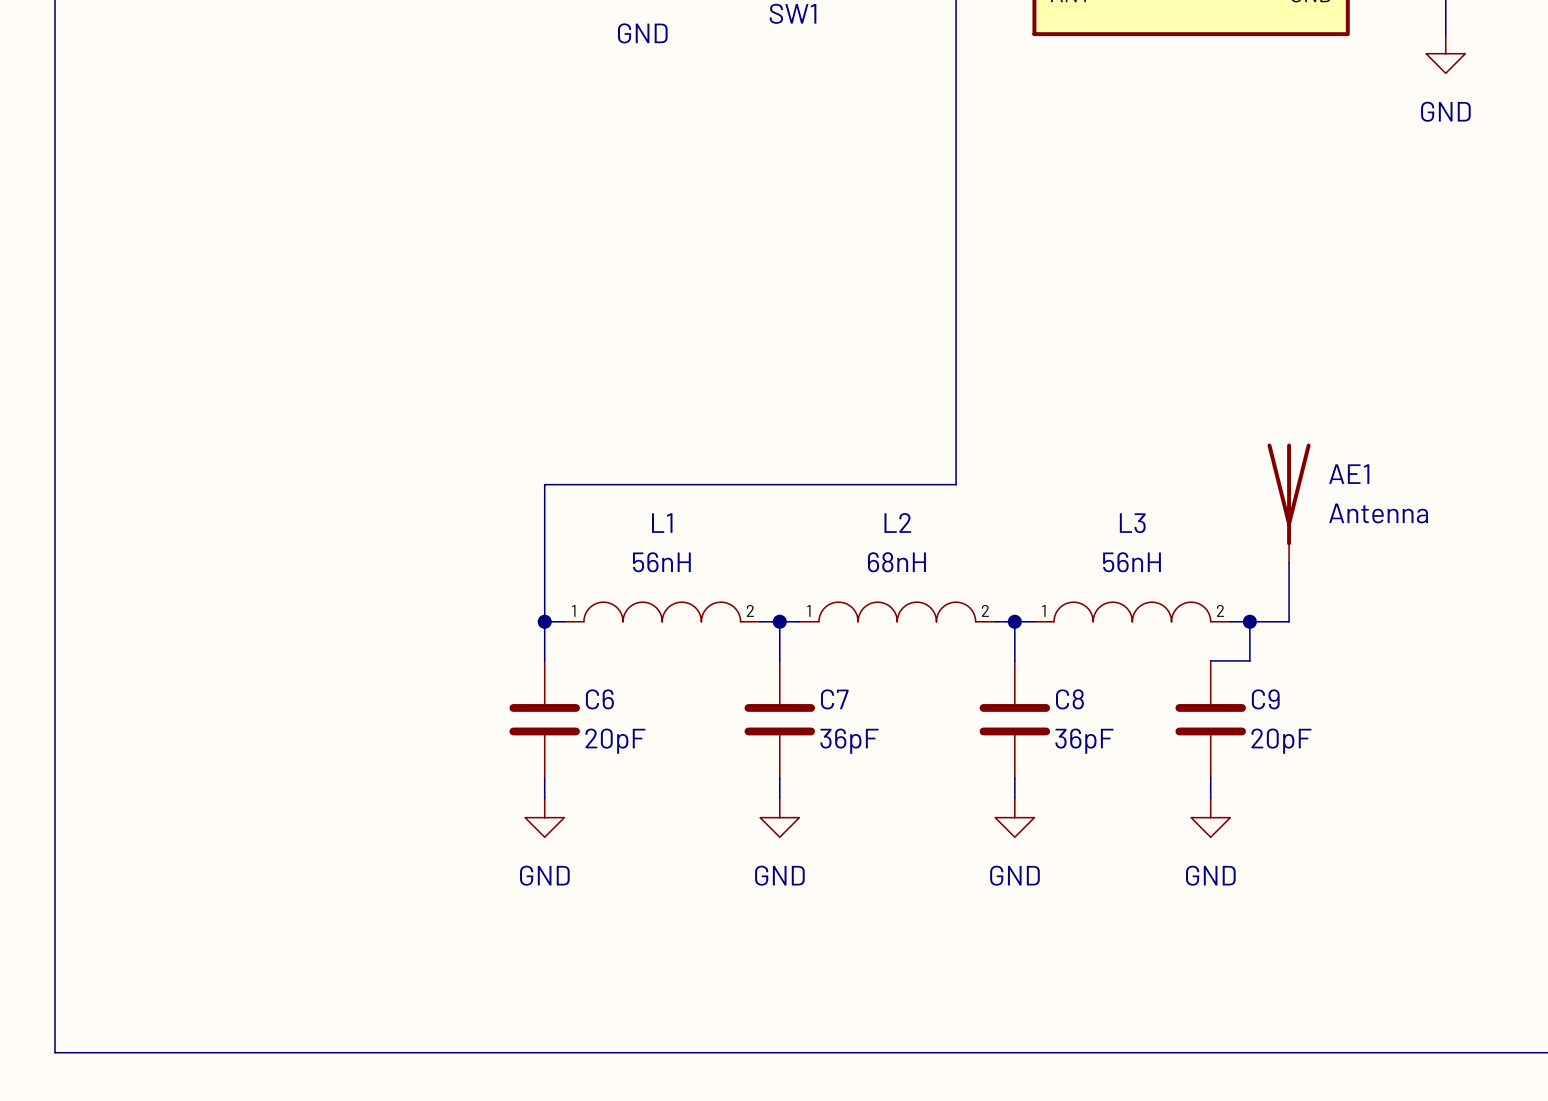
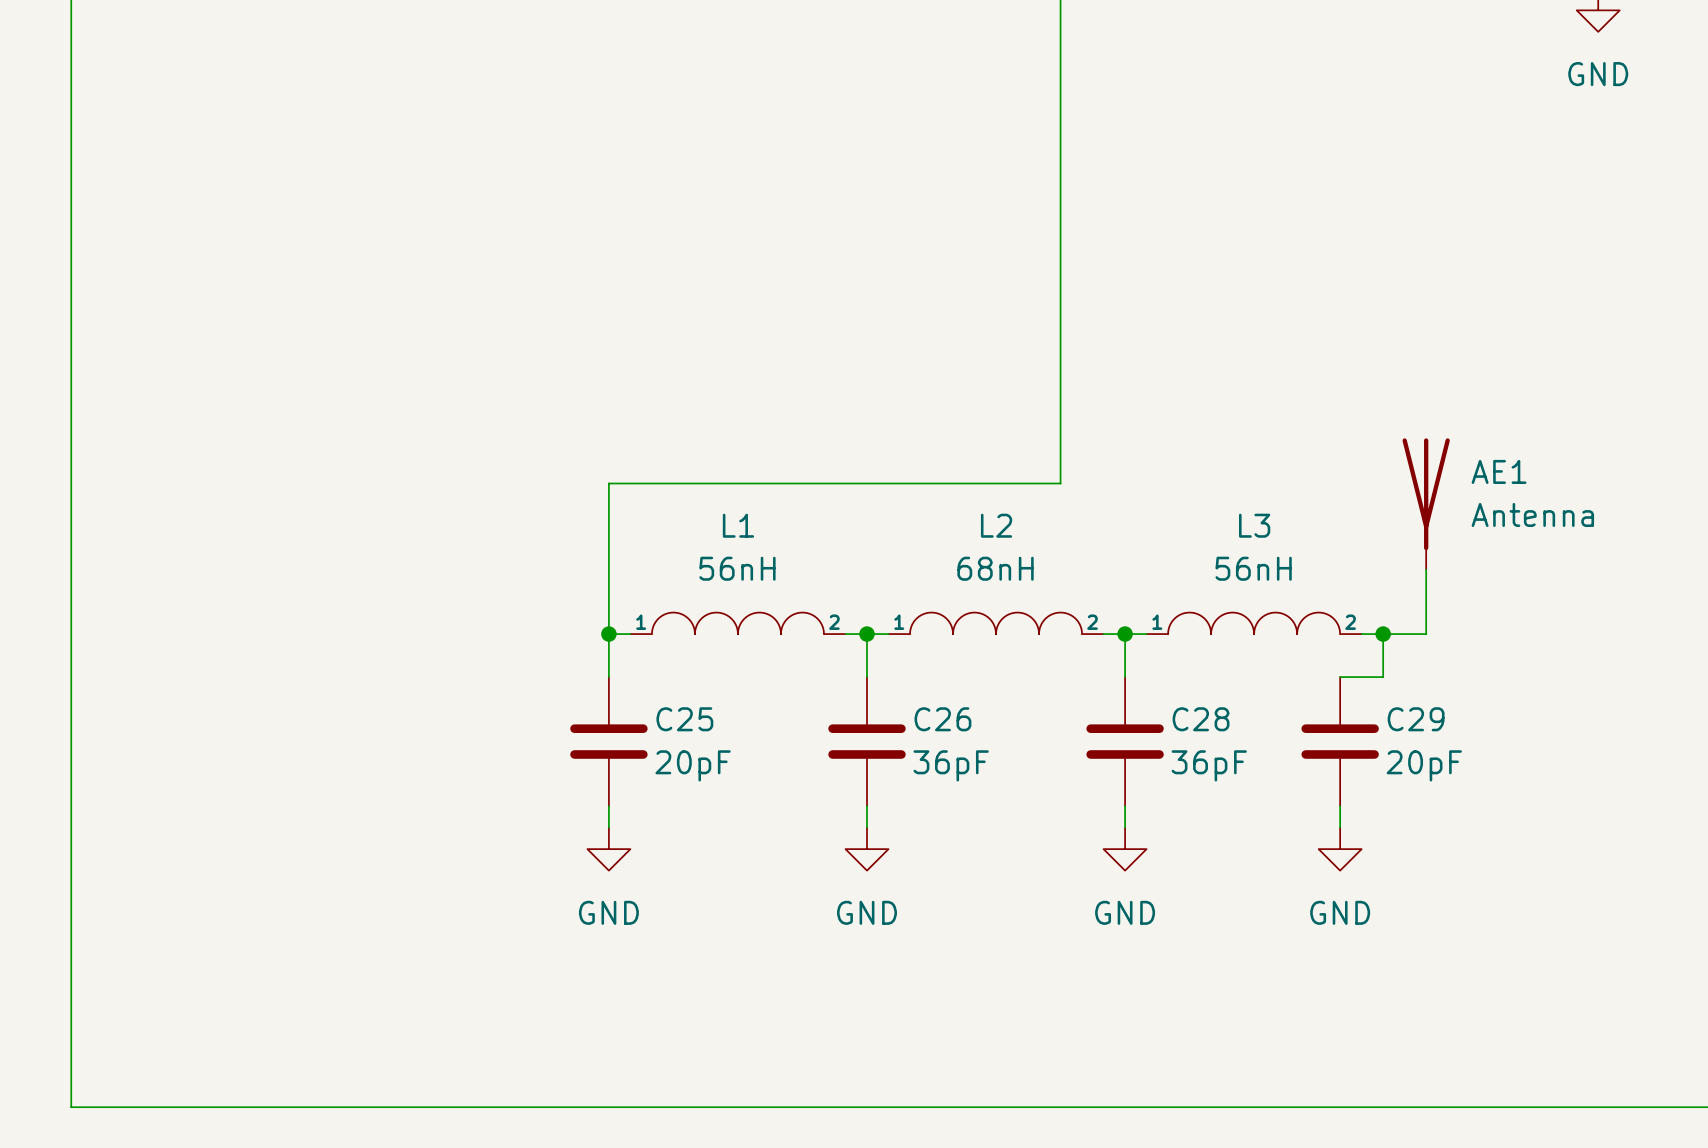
C6 name: C6 (599, 699) -> C25 (684, 719)
C7 name: C7 (834, 699) -> C26 (942, 719)
C8 name: C8 (1069, 699) -> C28 (1201, 719)
C9 name: C9 (1265, 699) -> C29 (1416, 719)

